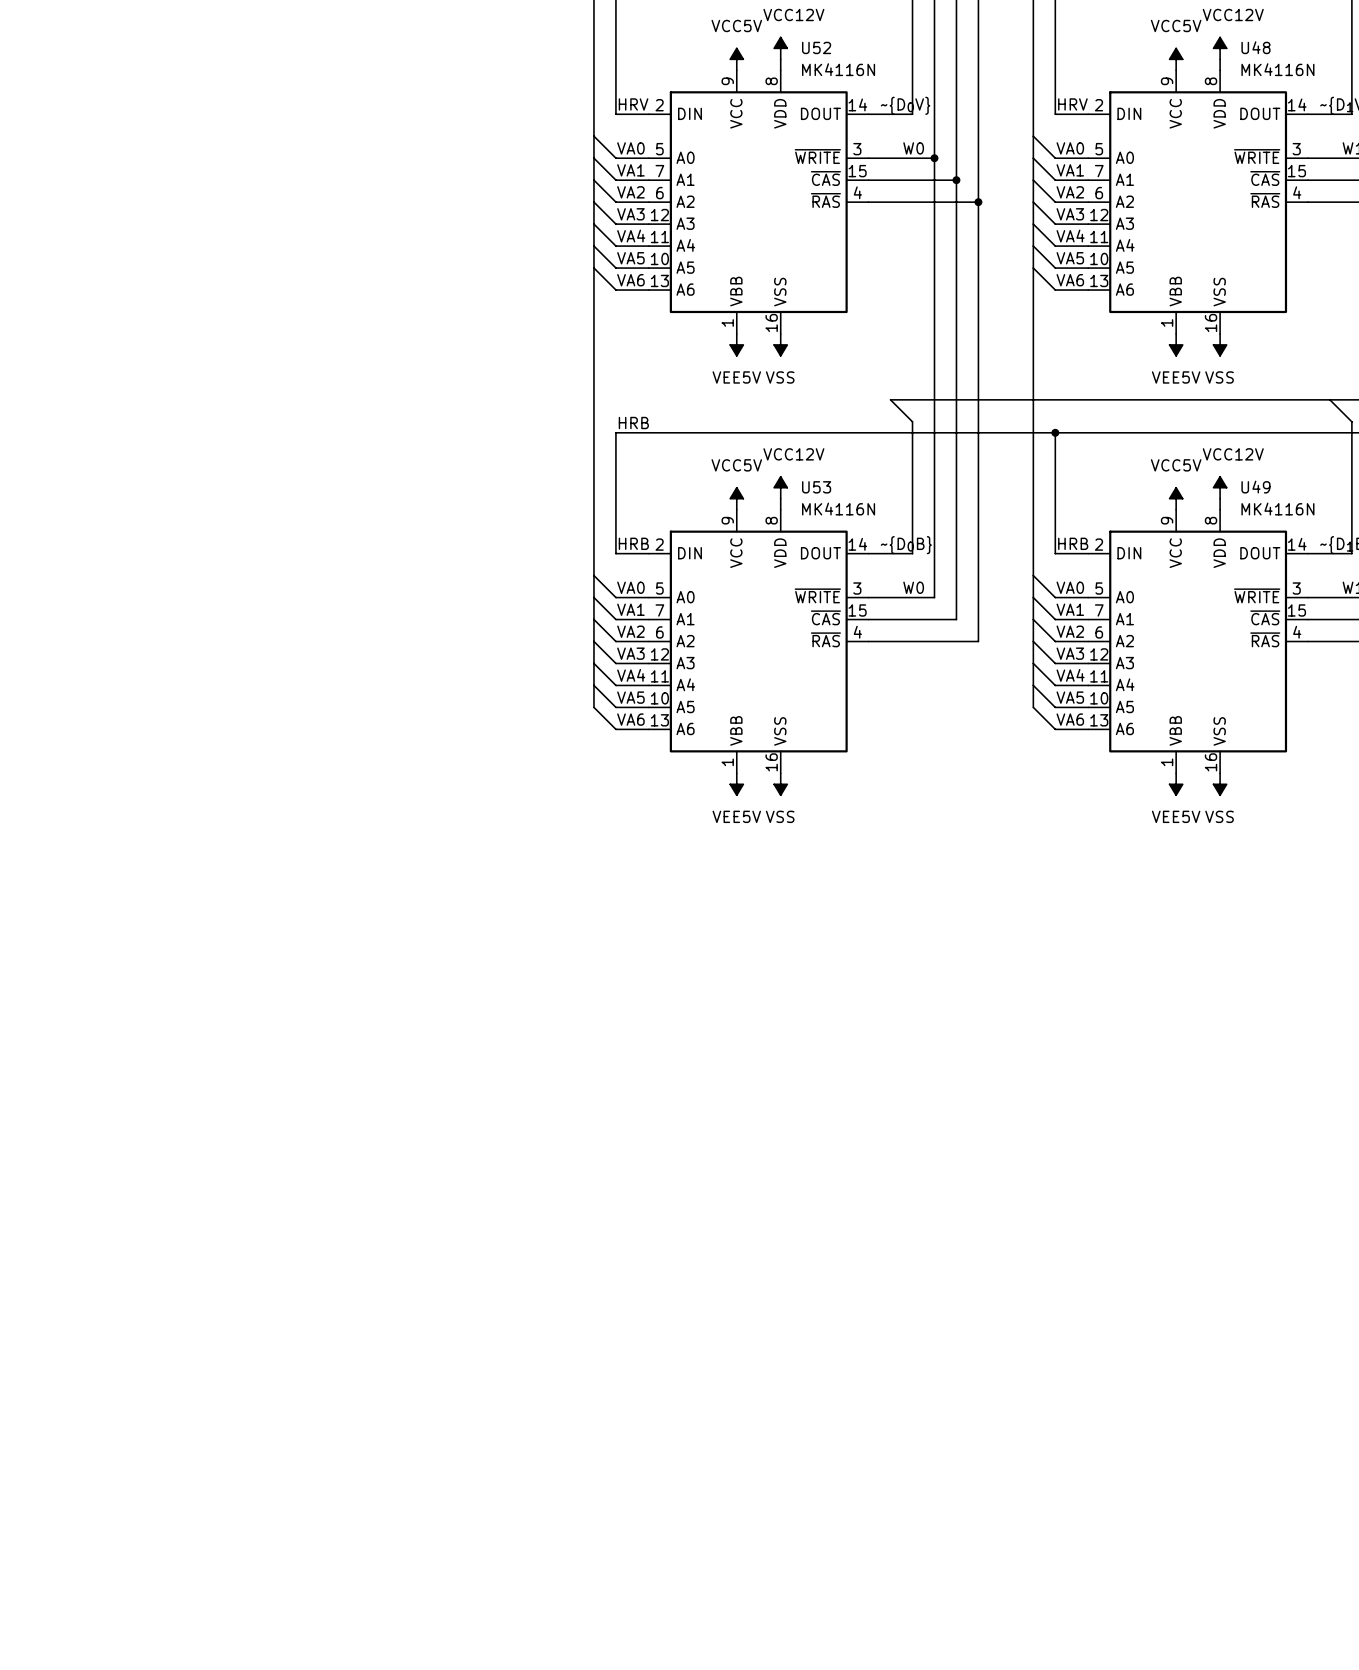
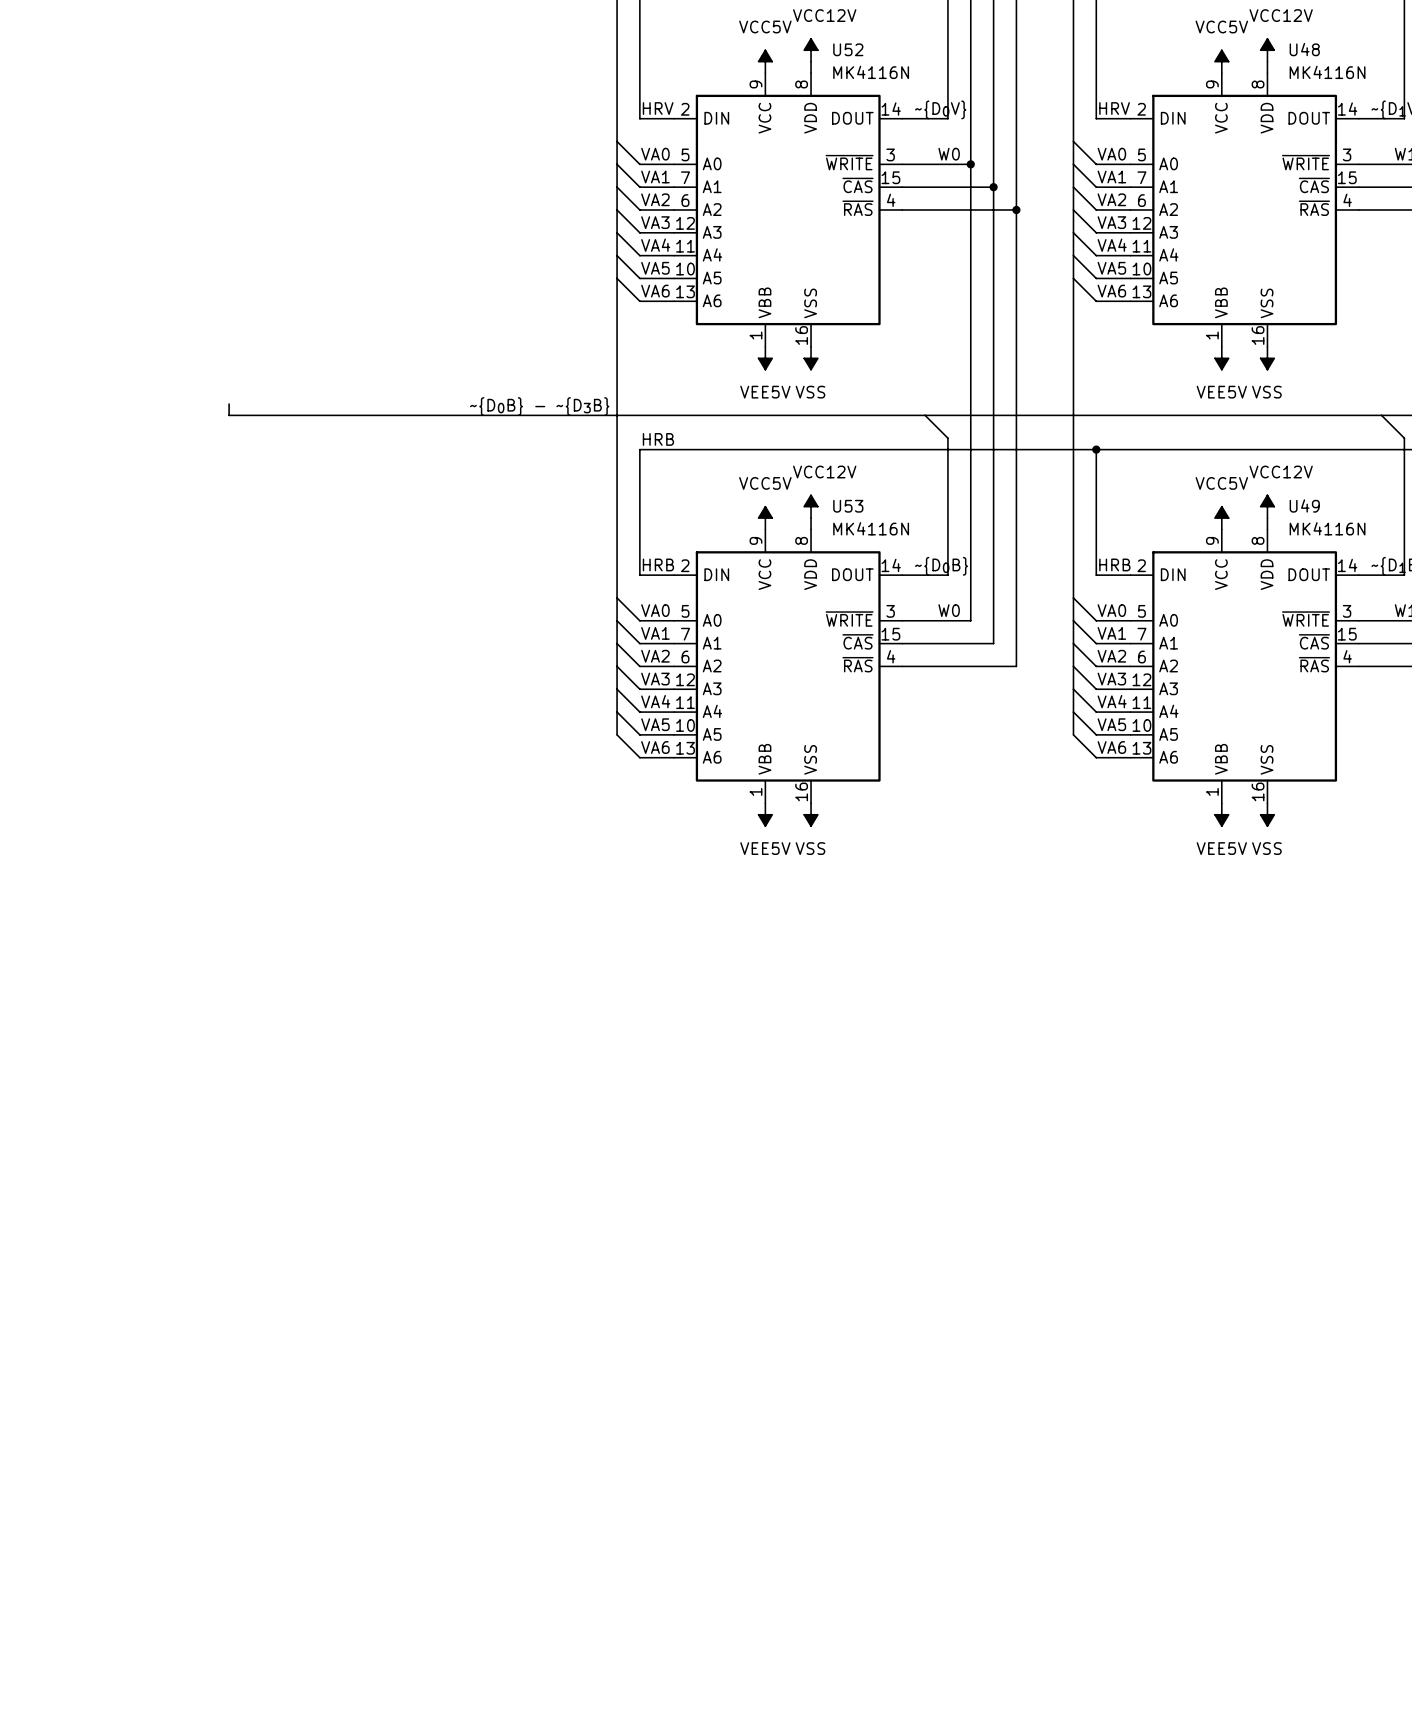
bus: none -> (229, 403) (229, 415) (925, 415)
label: none -> ~{D0B} - ~{D3B} (539, 406)

